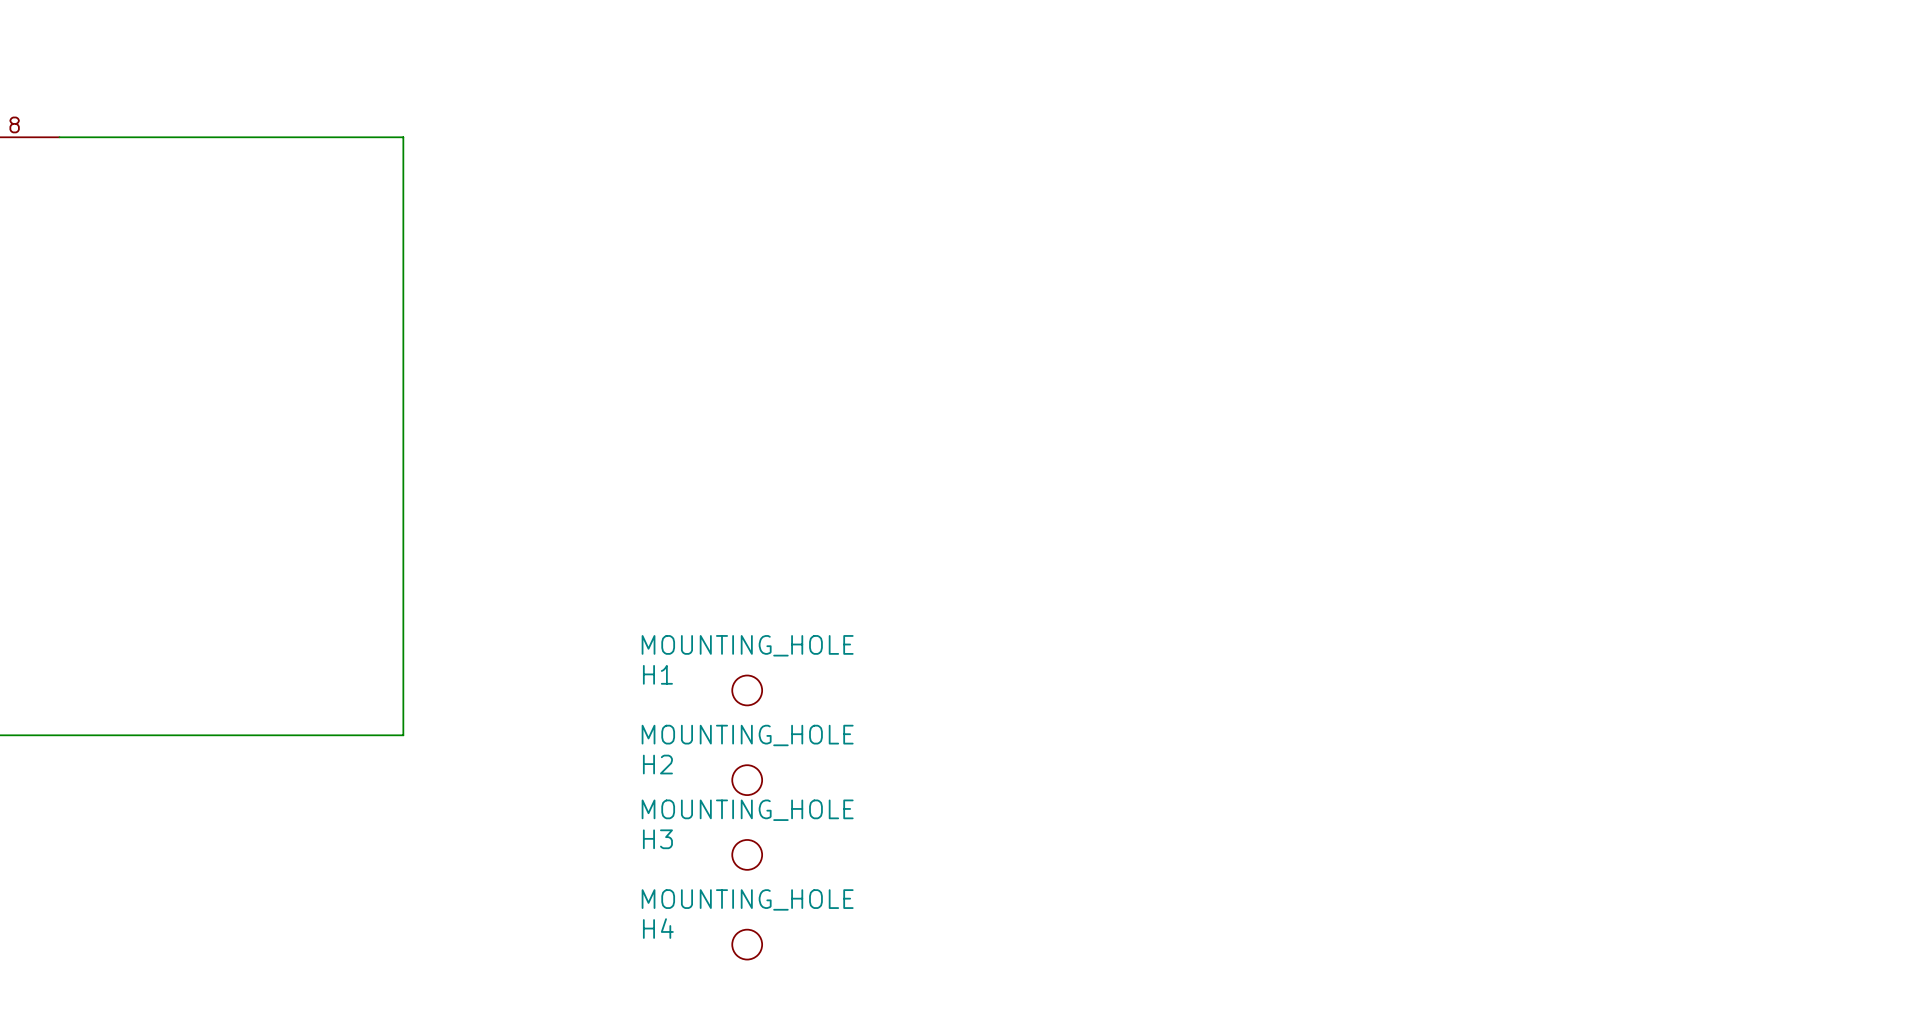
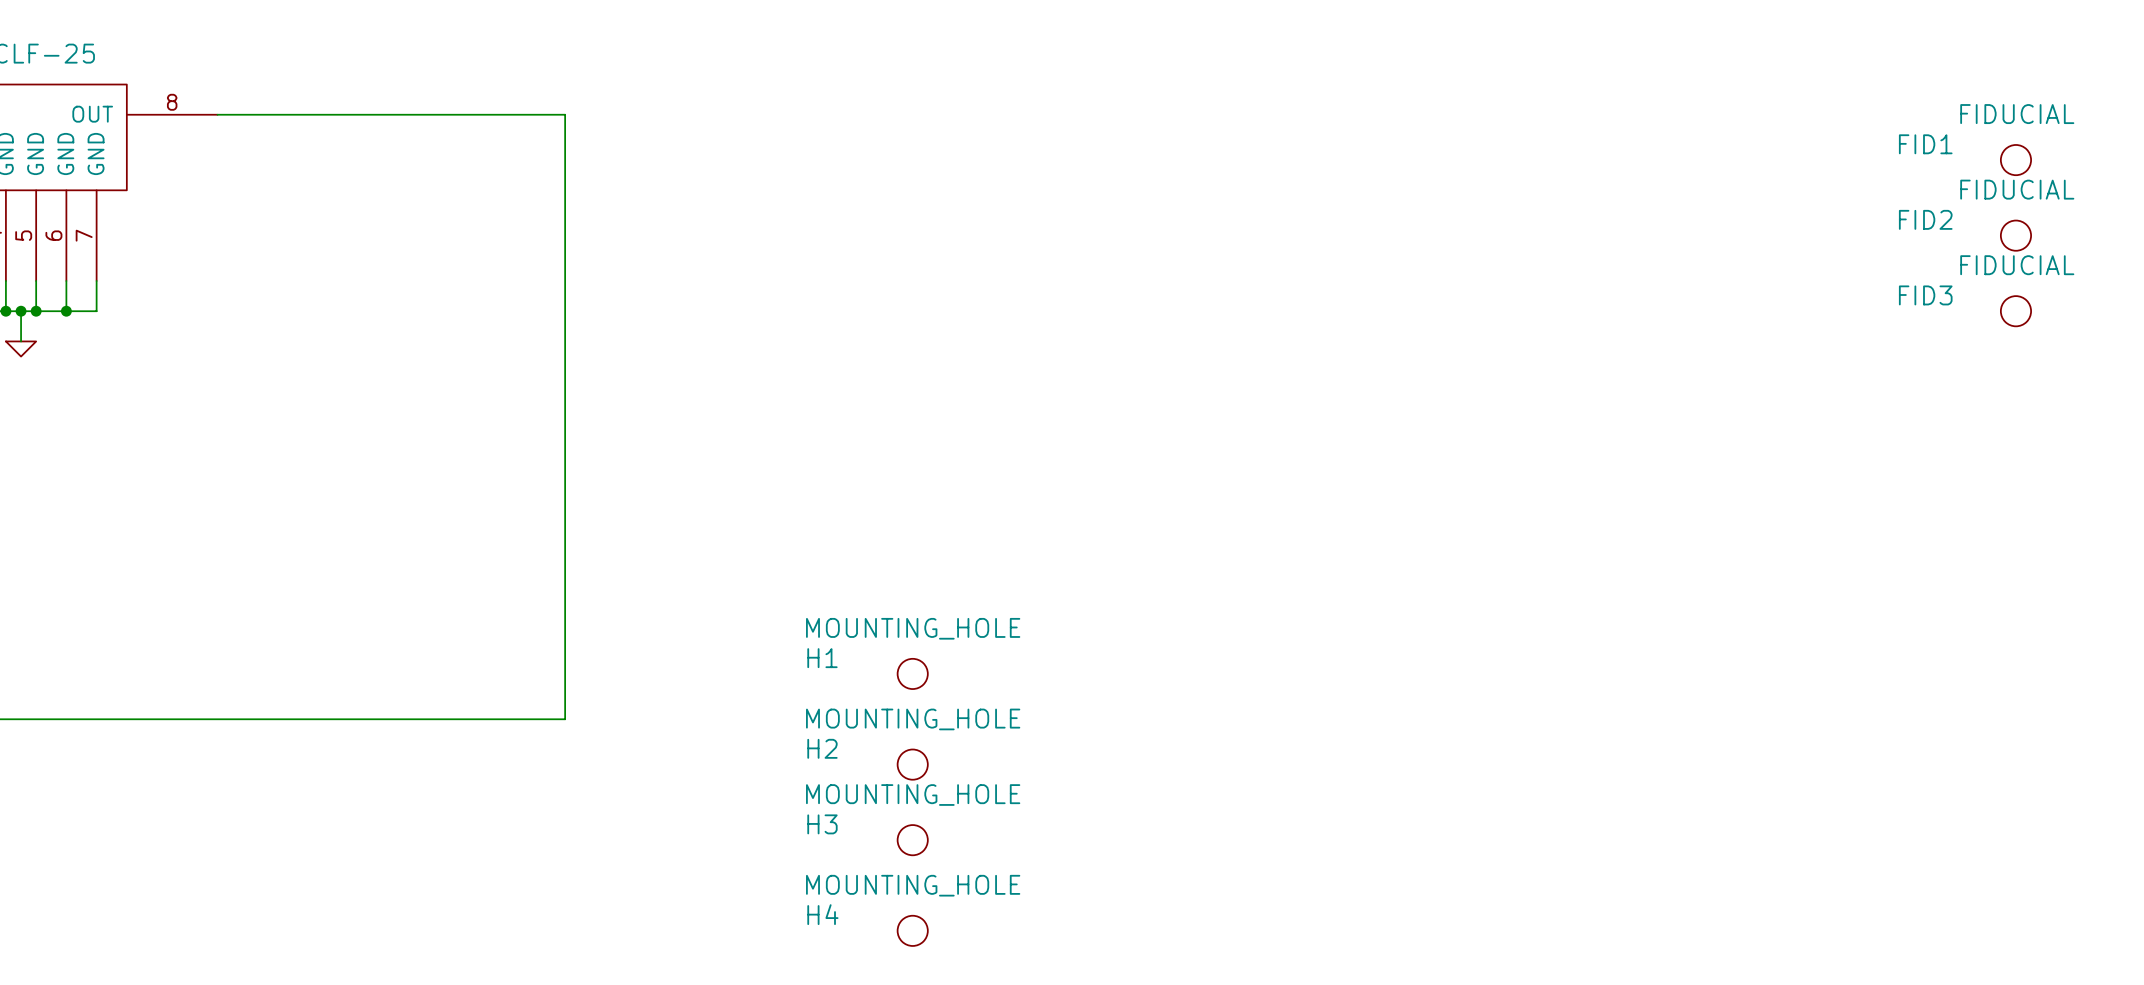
FID1: none -> FIDUCIAL (2015, 160)
FID2: none -> FIDUCIAL (2015, 235)
FID3: none -> FIDUCIAL (2015, 311)

